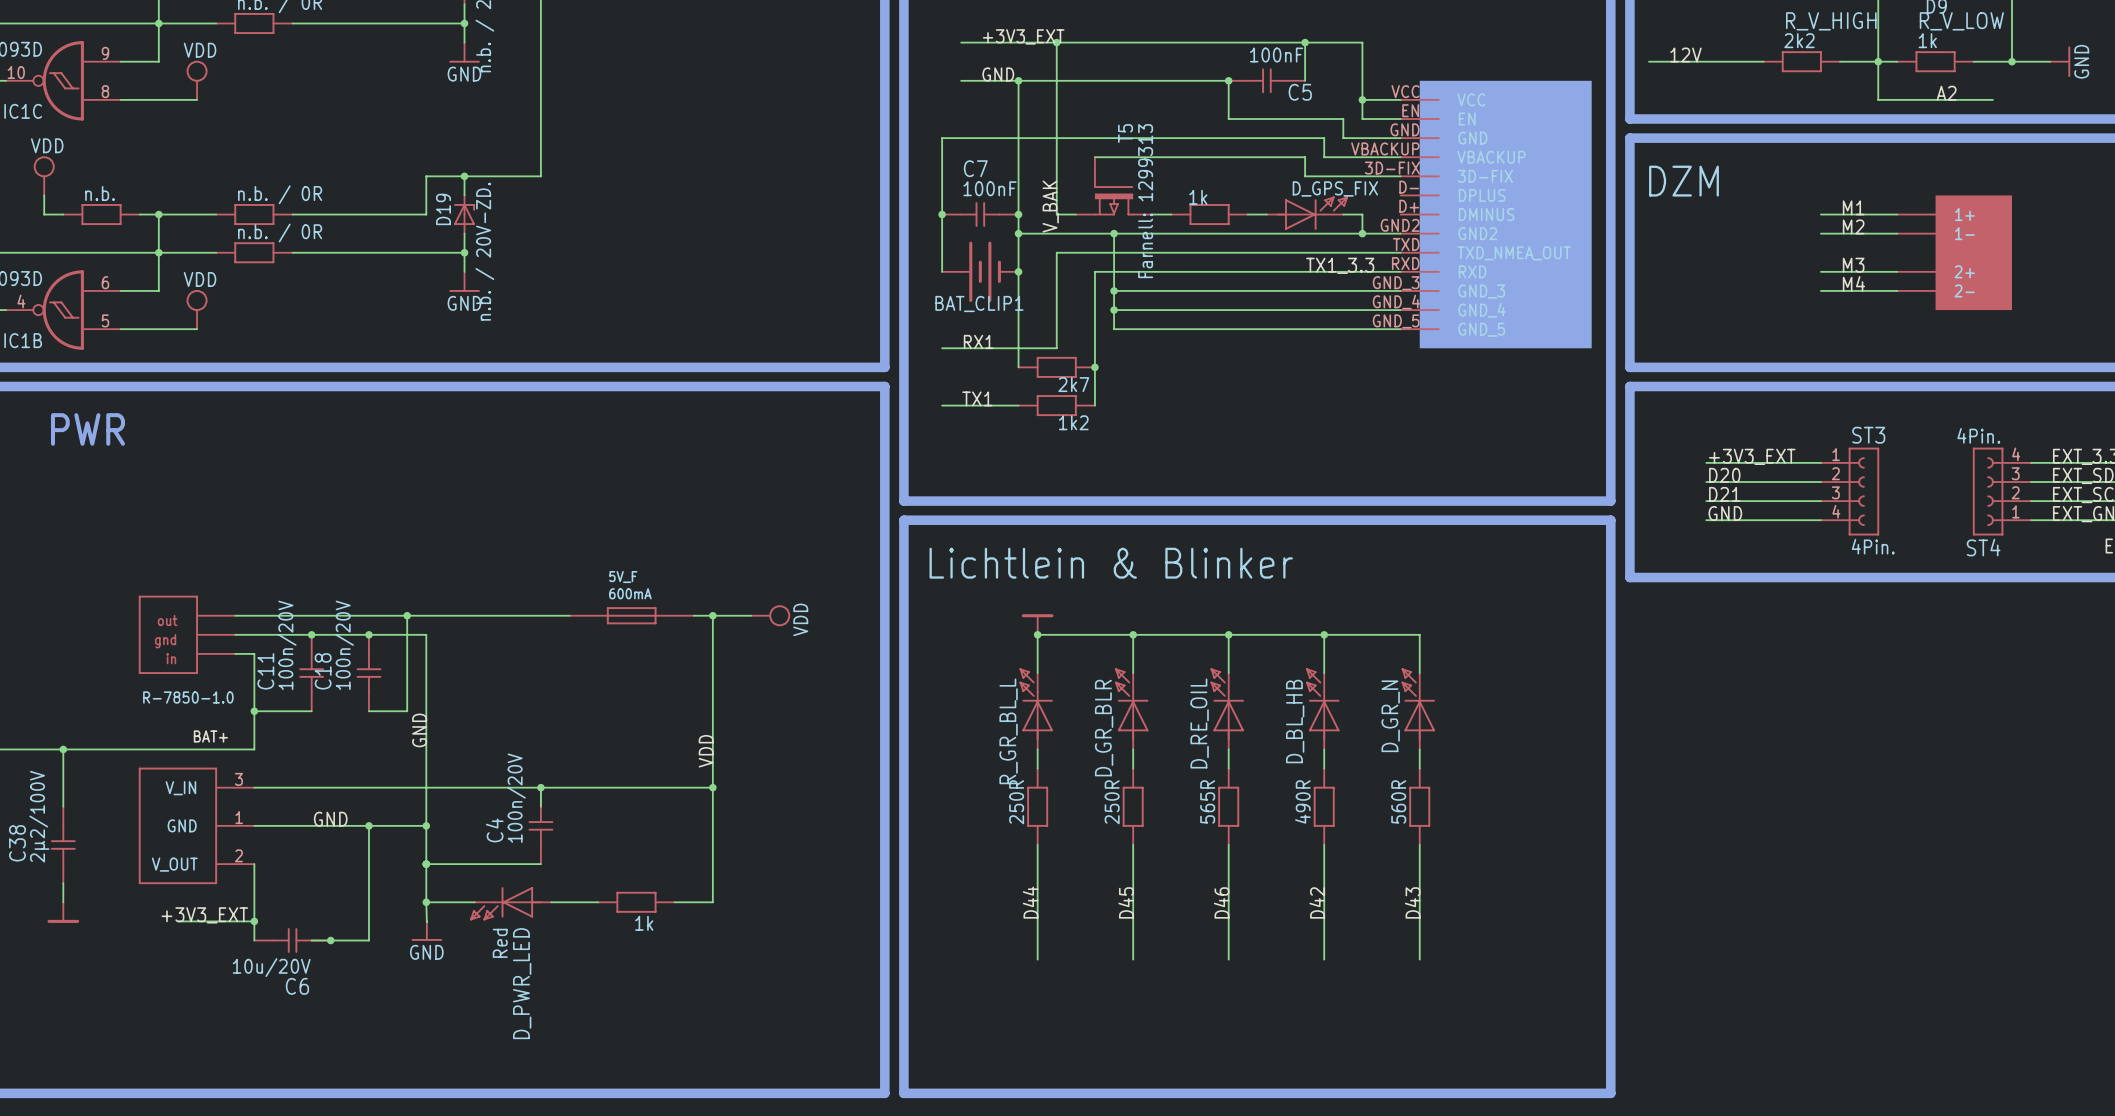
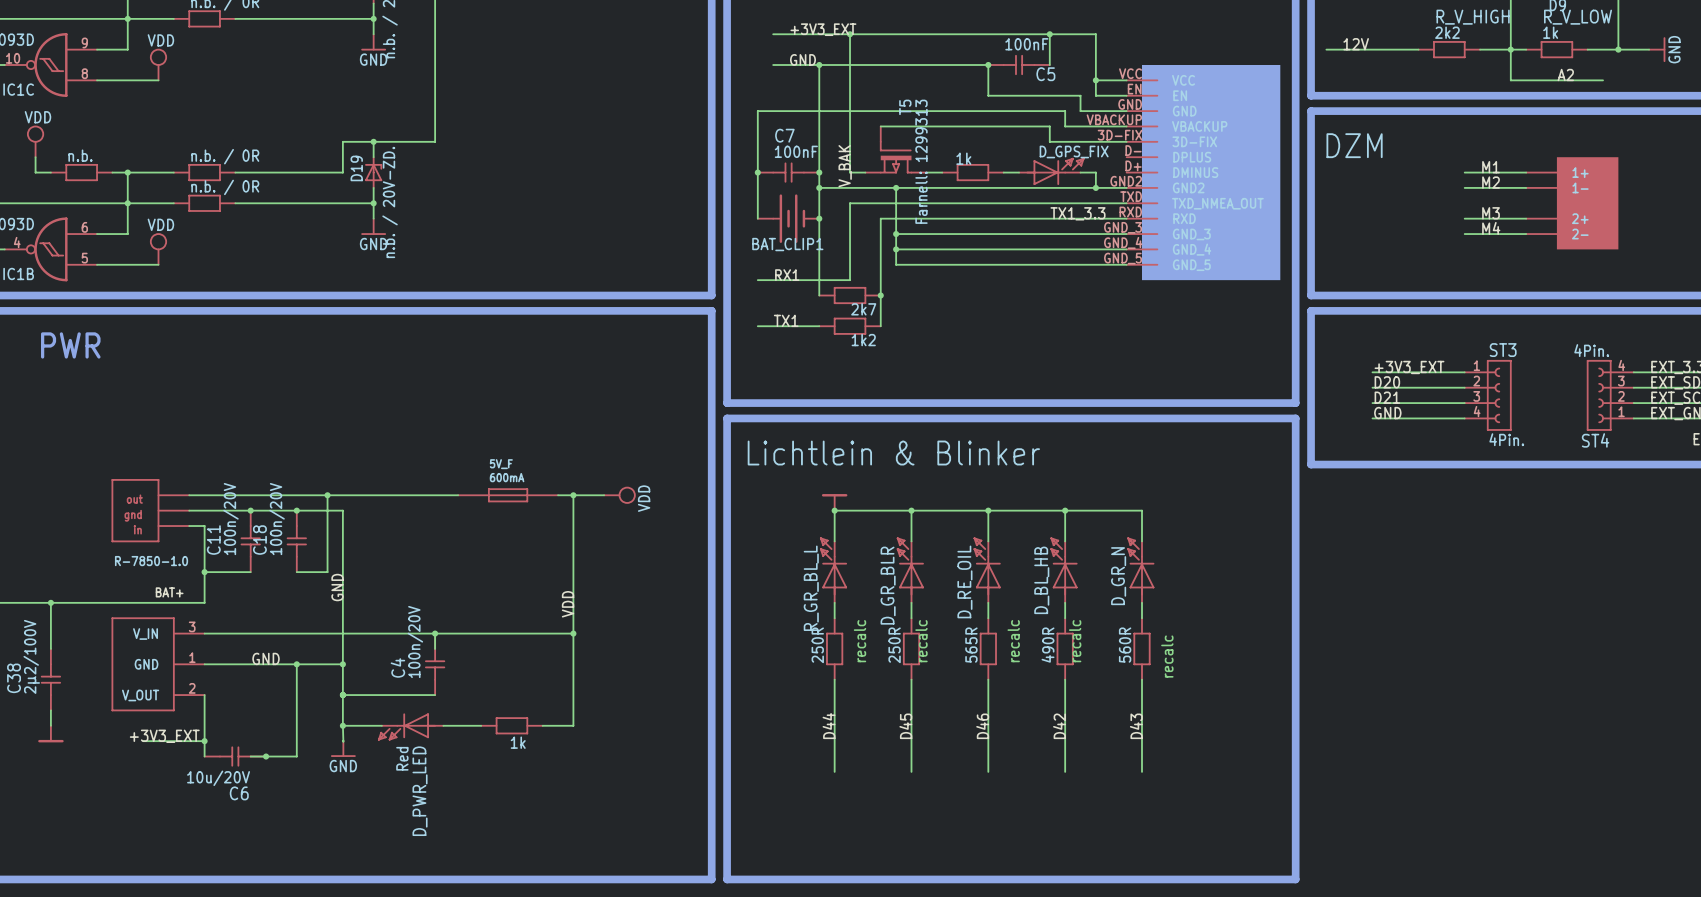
text: none -> recalc (860, 641)
text: none -> recalc (921, 641)
text: none -> recalc (1013, 641)
text: none -> recalc (1075, 641)
text: none -> recalc (1167, 656)

